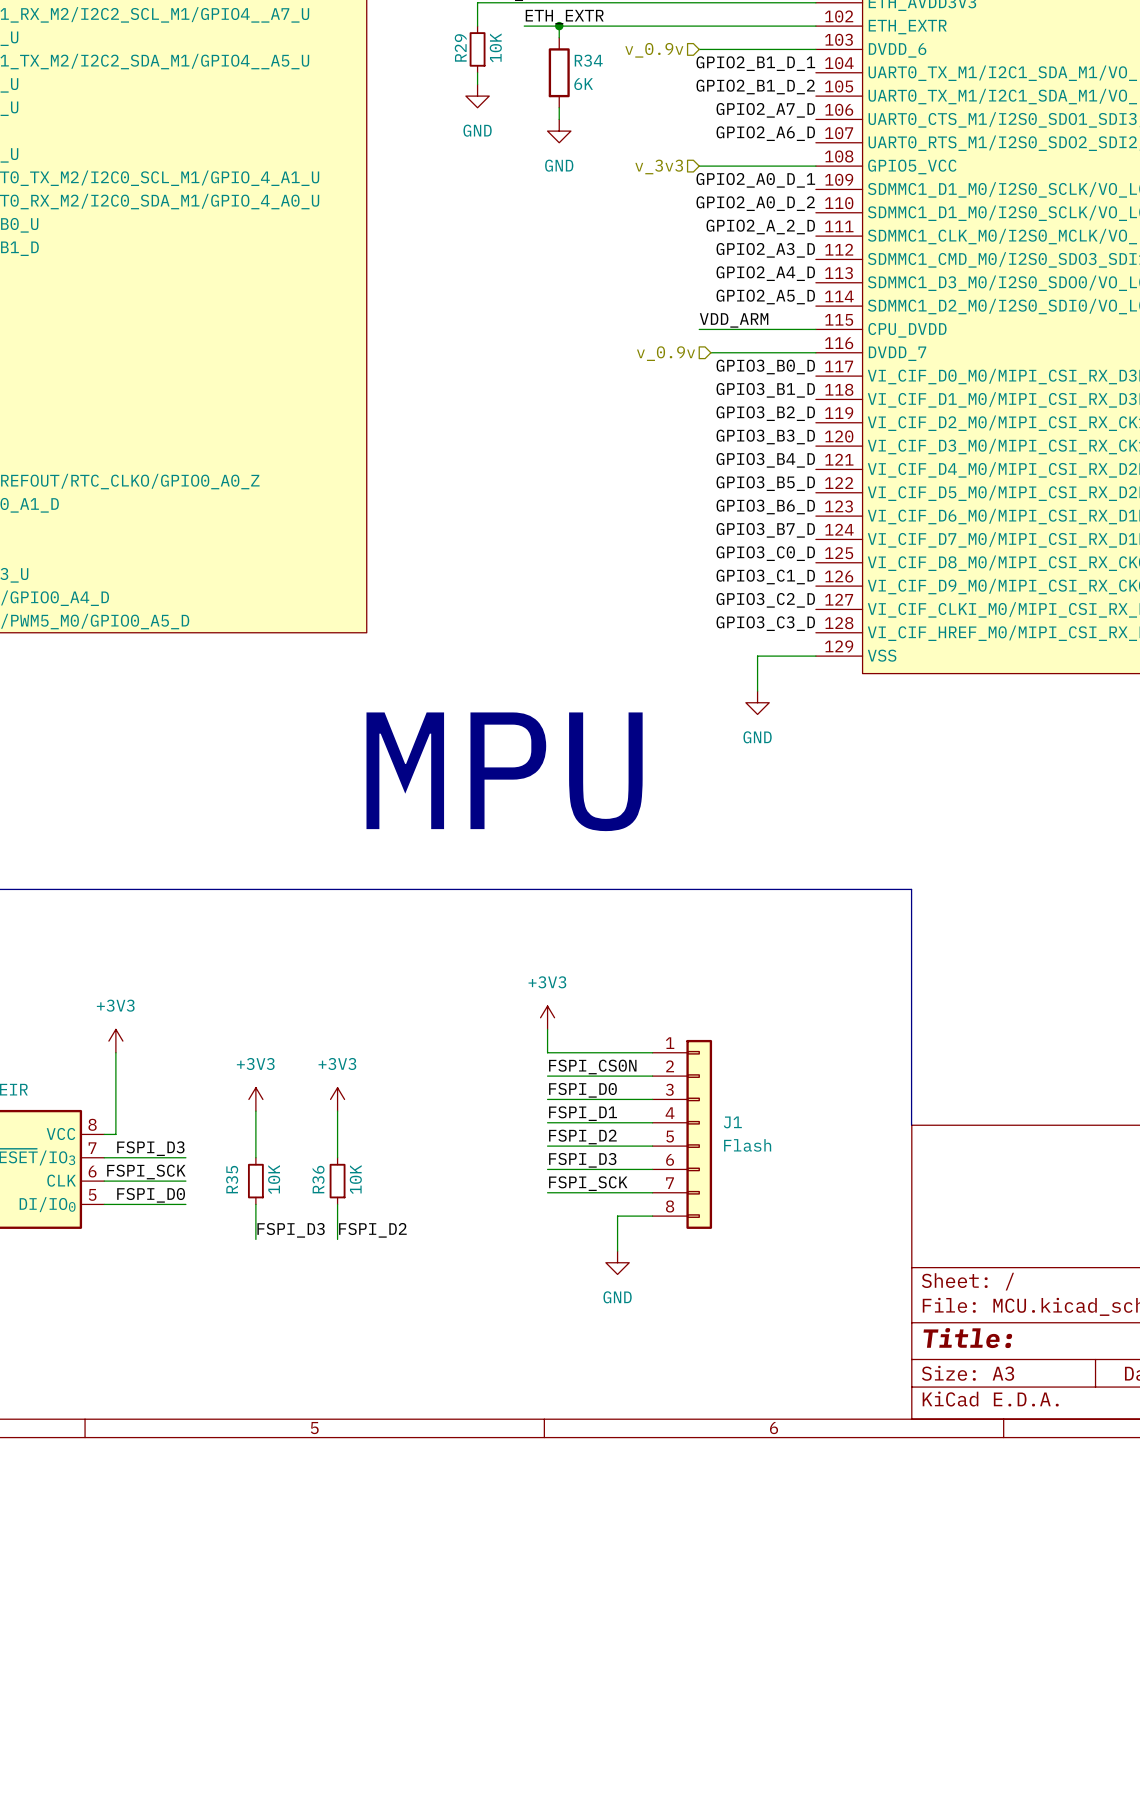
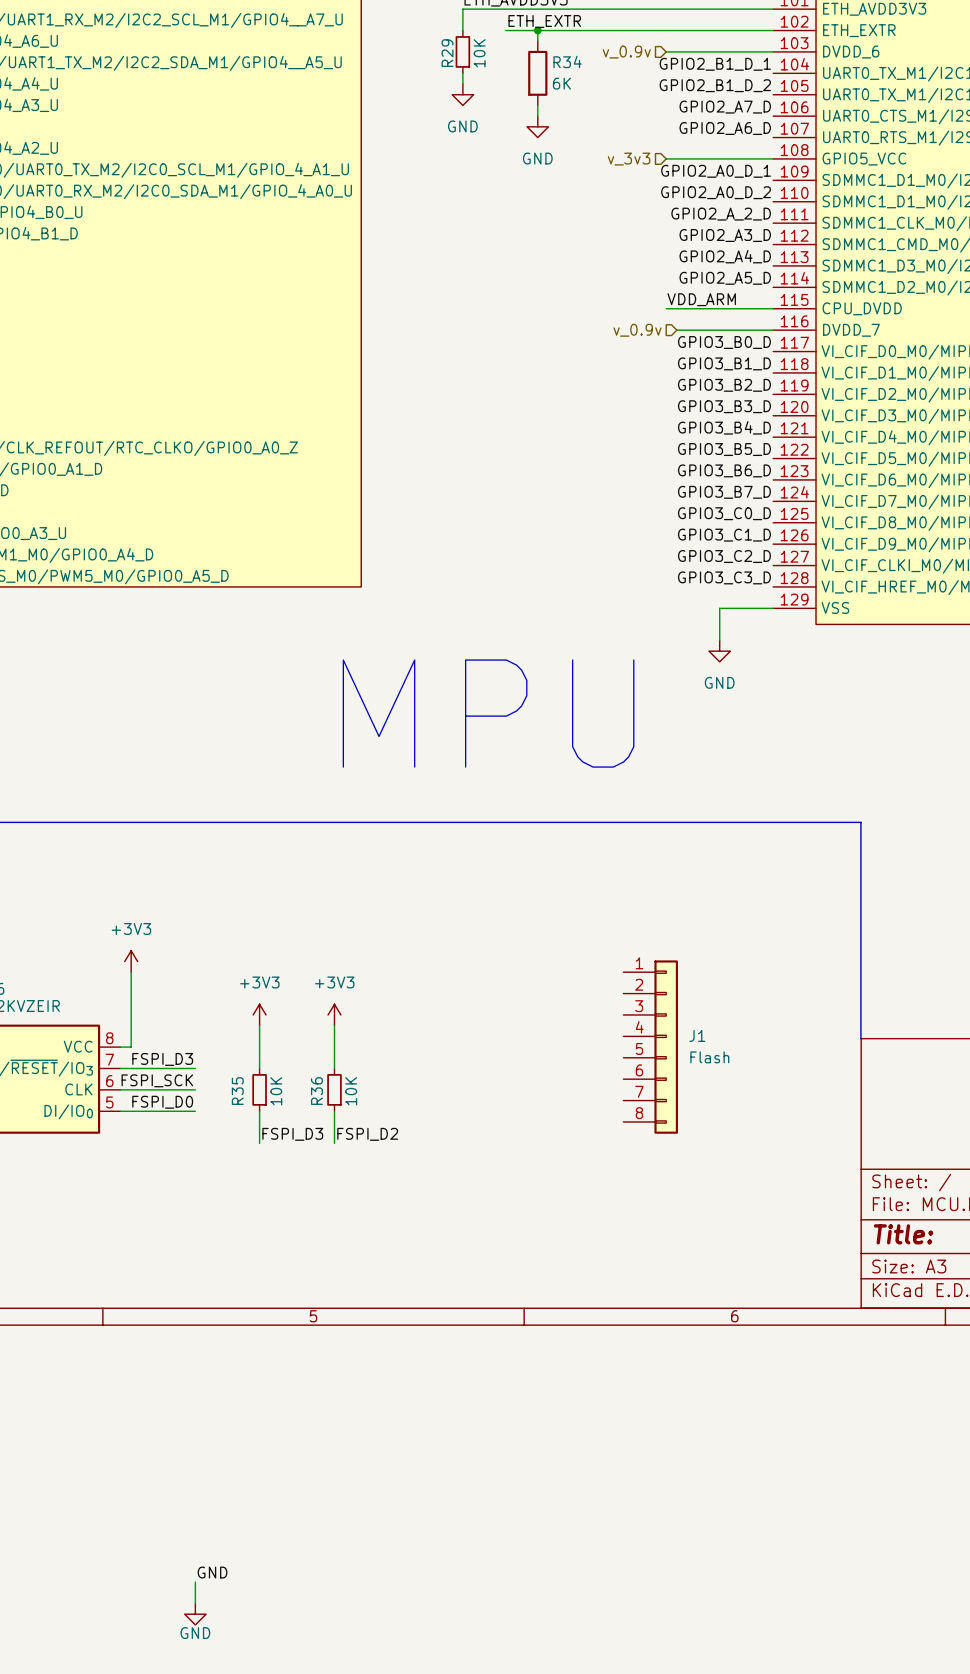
power symbol: +3V3 (547, 1017) -> none
wire: (547, 1029) (547, 1052) (652, 1052) -> none
label: FSPI_CS0N (592, 1066) -> none
wire: (547, 1076) (652, 1076) -> none
label: FSPI_D0 (582, 1090) -> none
wire: (547, 1099) (652, 1099) -> none
label: FSPI_D1 (583, 1113) -> none
wire: (547, 1122) (652, 1122) -> none
label: FSPI_D2 (582, 1136) -> none
wire: (547, 1146) (652, 1146) -> none
label: FSPI_D3 (582, 1160) -> none
wire: (547, 1169) (652, 1169) -> none
label: FSPI_SCK (588, 1183) -> none
wire: (547, 1192) (652, 1192) -> none
wire: (652, 1216) (617, 1216) (617, 1251) -> none
power symbol: GND (617, 1262) -> none
label: none -> GND (212, 1572)
wire: none -> (195, 1582) (195, 1603)
power symbol: none -> GND (195, 1614)

